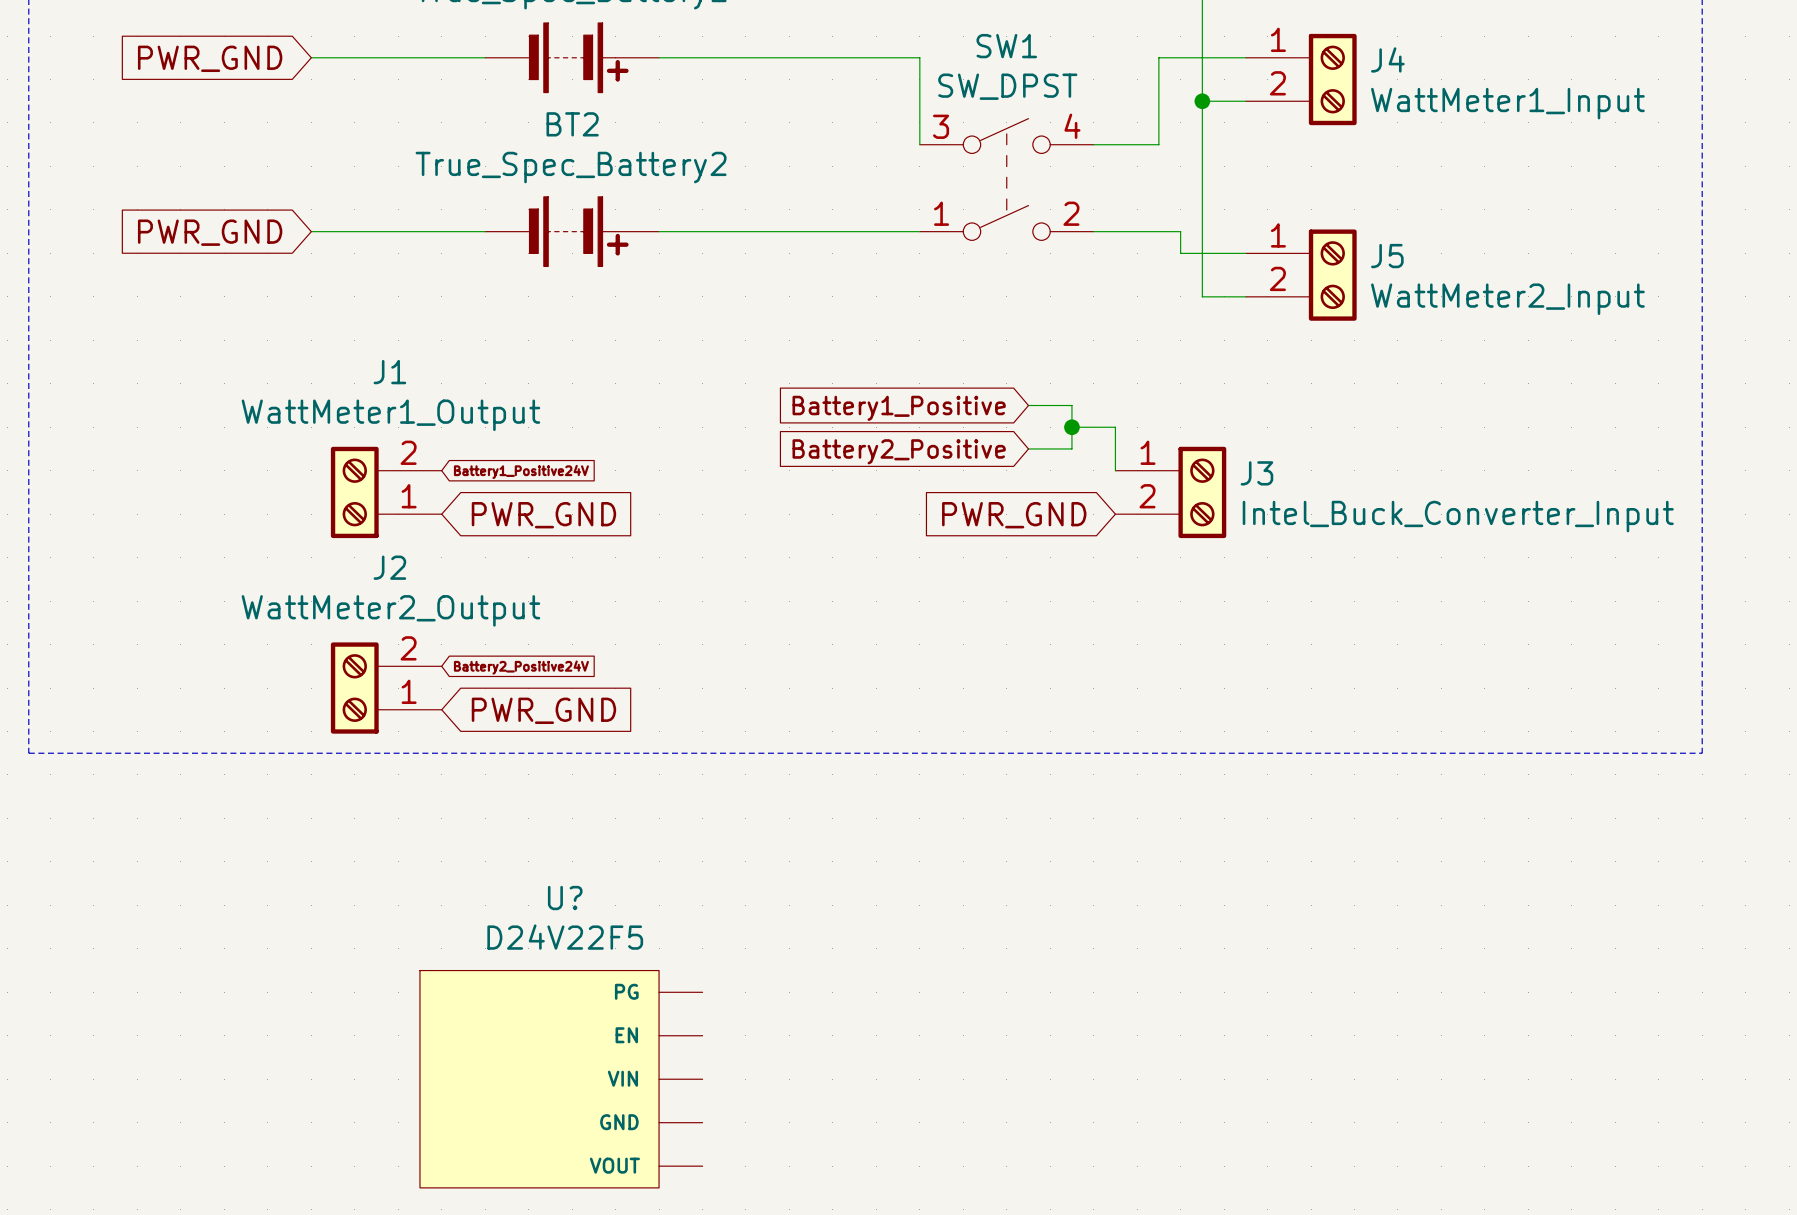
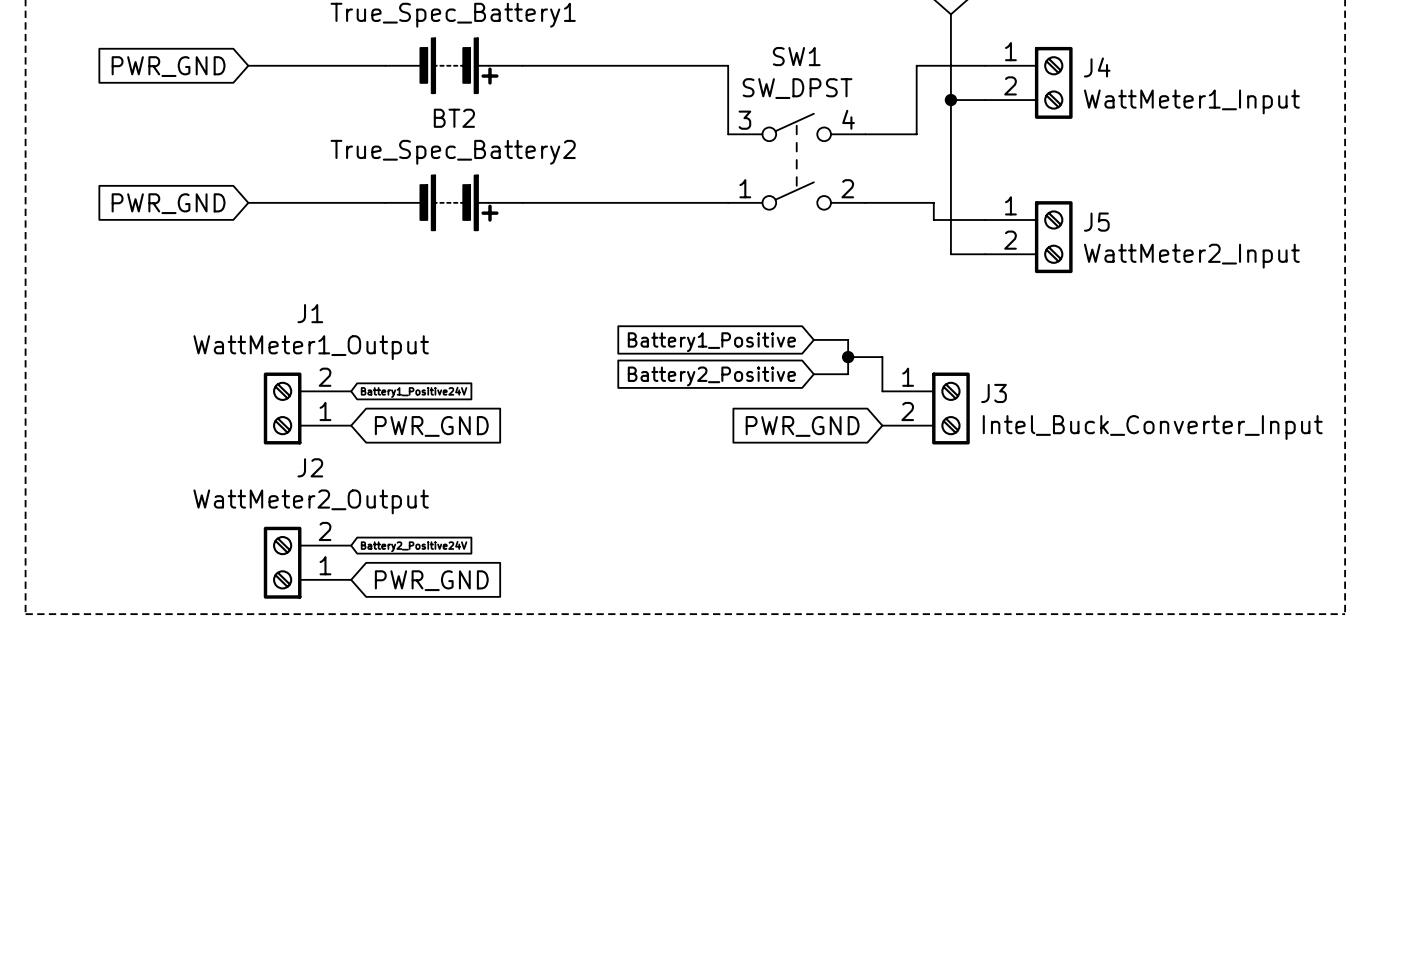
U?: D24V22F5 (561, 1079) -> none

